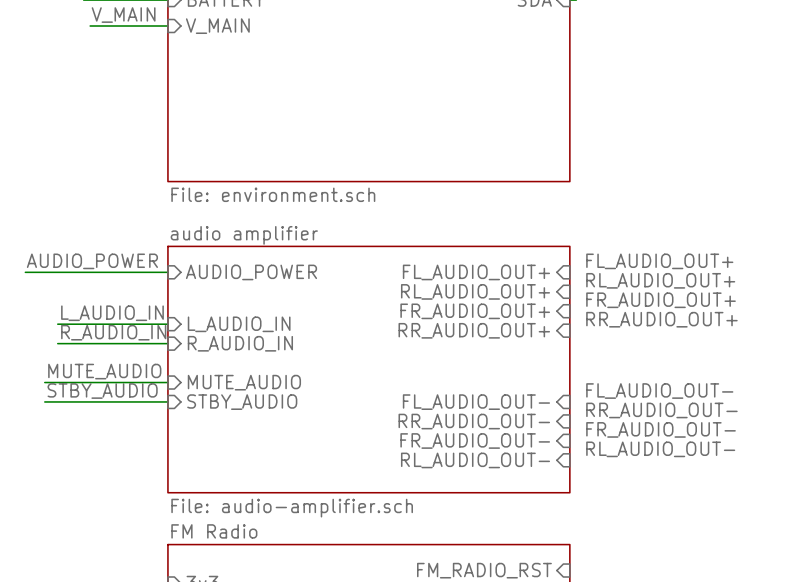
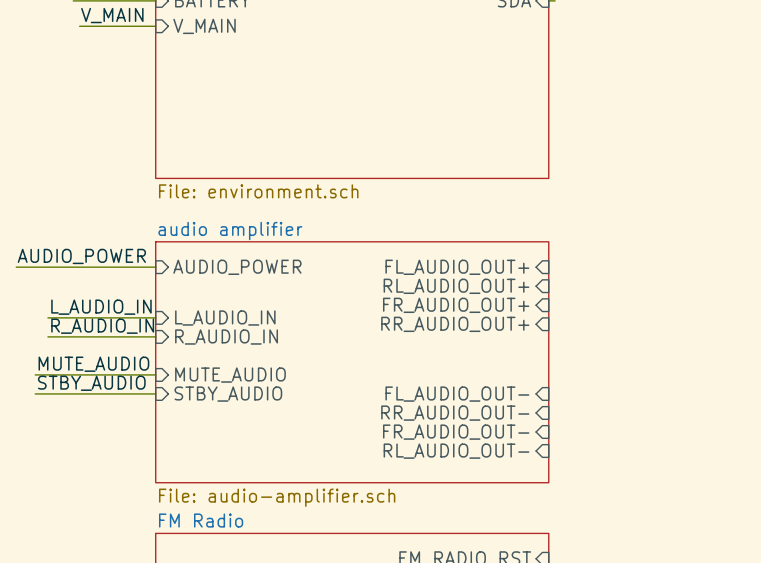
label: FL_AUDIO_OUT+ (659, 261) -> none
label: RL_AUDIO_OUT+ (660, 280) -> none
label: FR_AUDIO_OUT+ (661, 300) -> none
label: RR_AUDIO_OUT+ (661, 319) -> none
label: FL_AUDIO_OUT- (659, 391) -> none
label: RR_AUDIO_OUT- (661, 410) -> none
label: FR_AUDIO_OUT- (661, 429) -> none
label: RL_AUDIO_OUT- (660, 449) -> none

